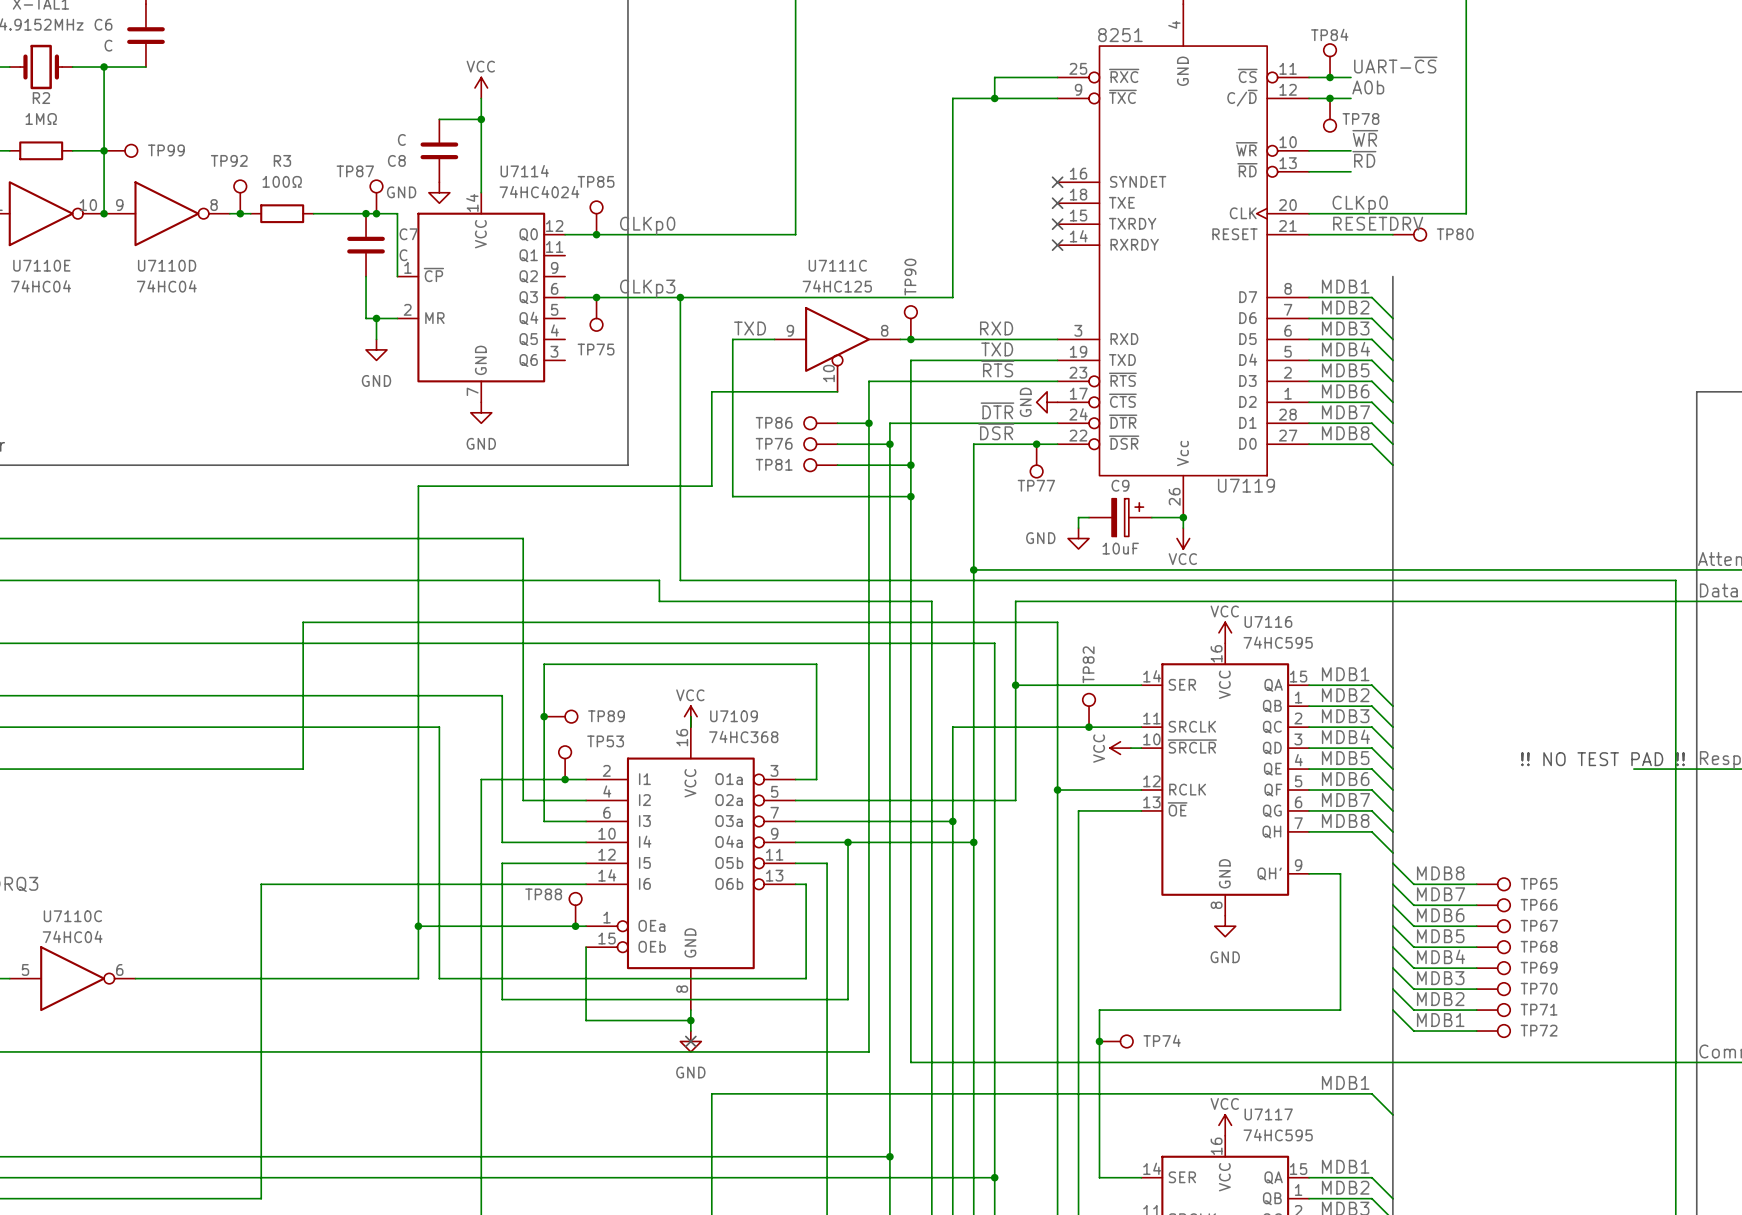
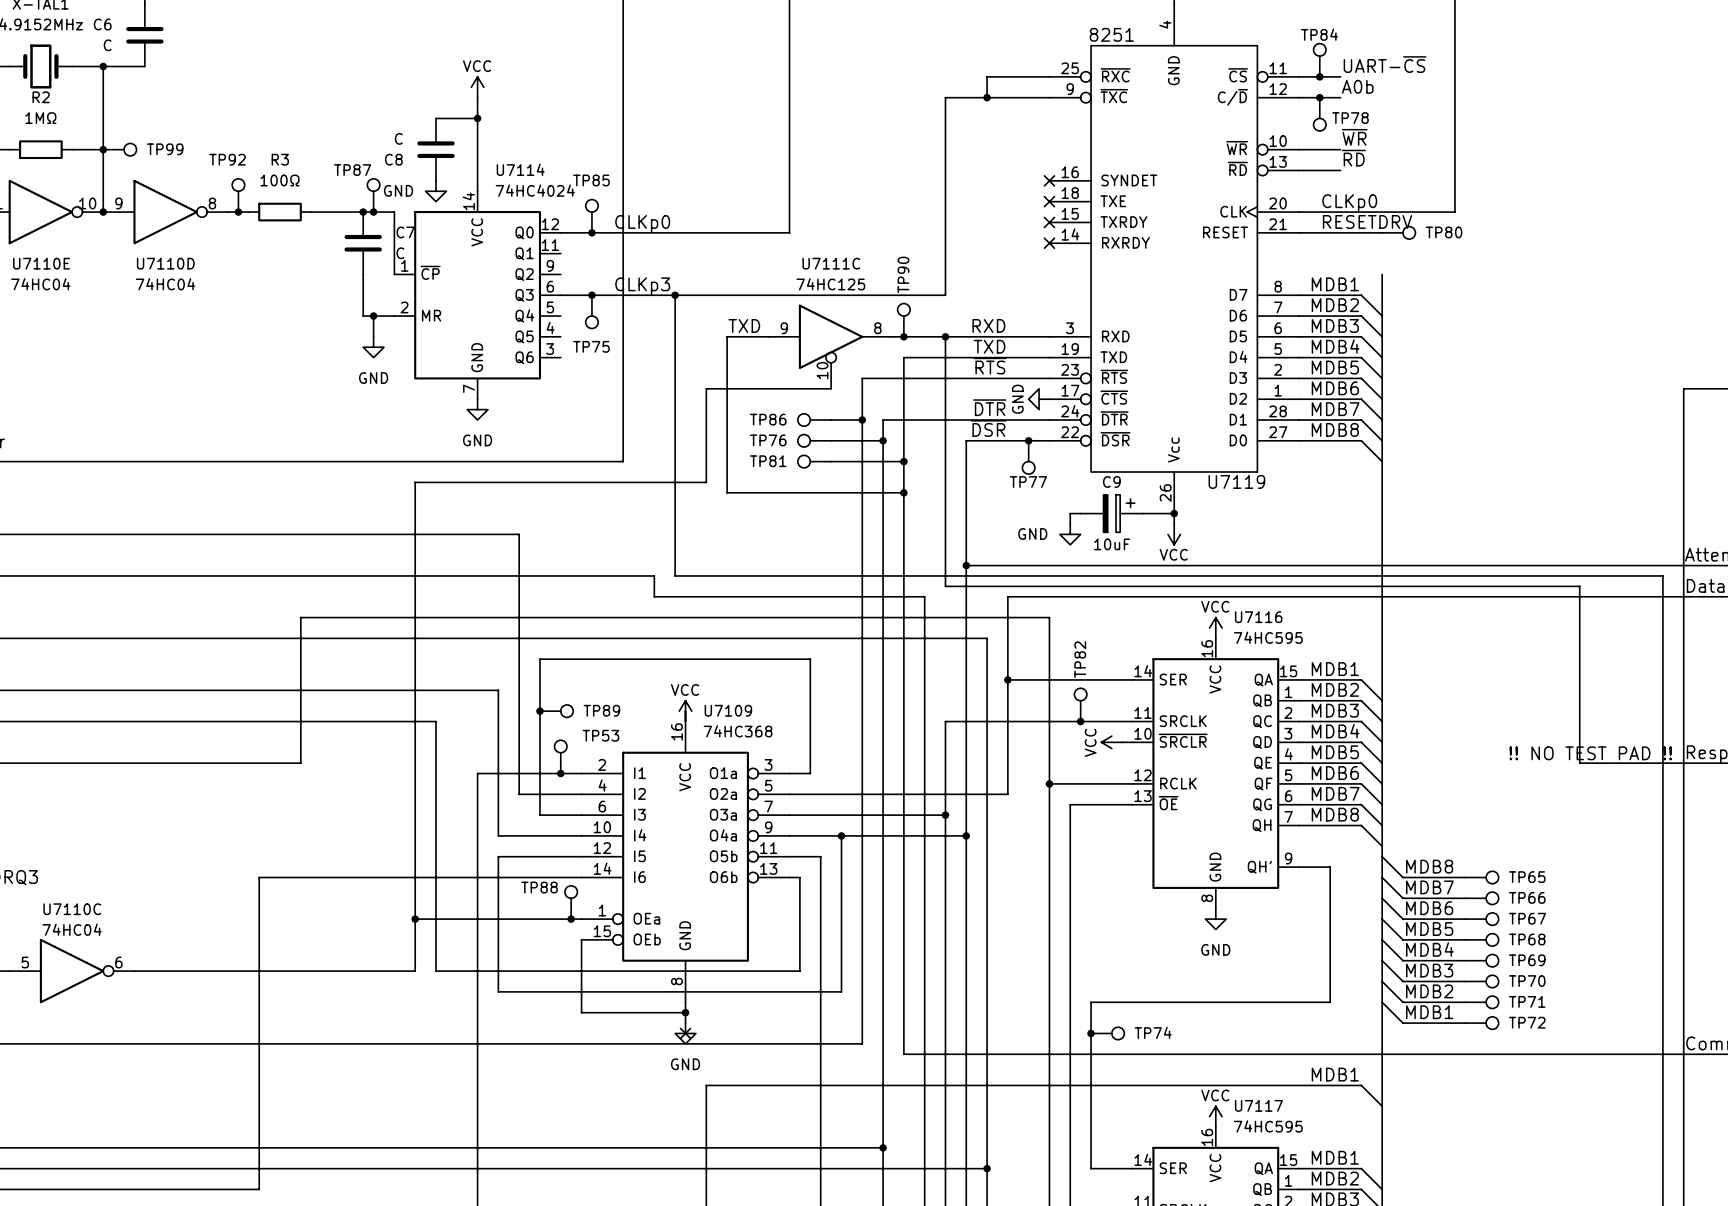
wire: none -> (945, 336) (945, 586) (1579, 586) (1579, 763) (1621, 763)
junction: none -> (945, 336)

